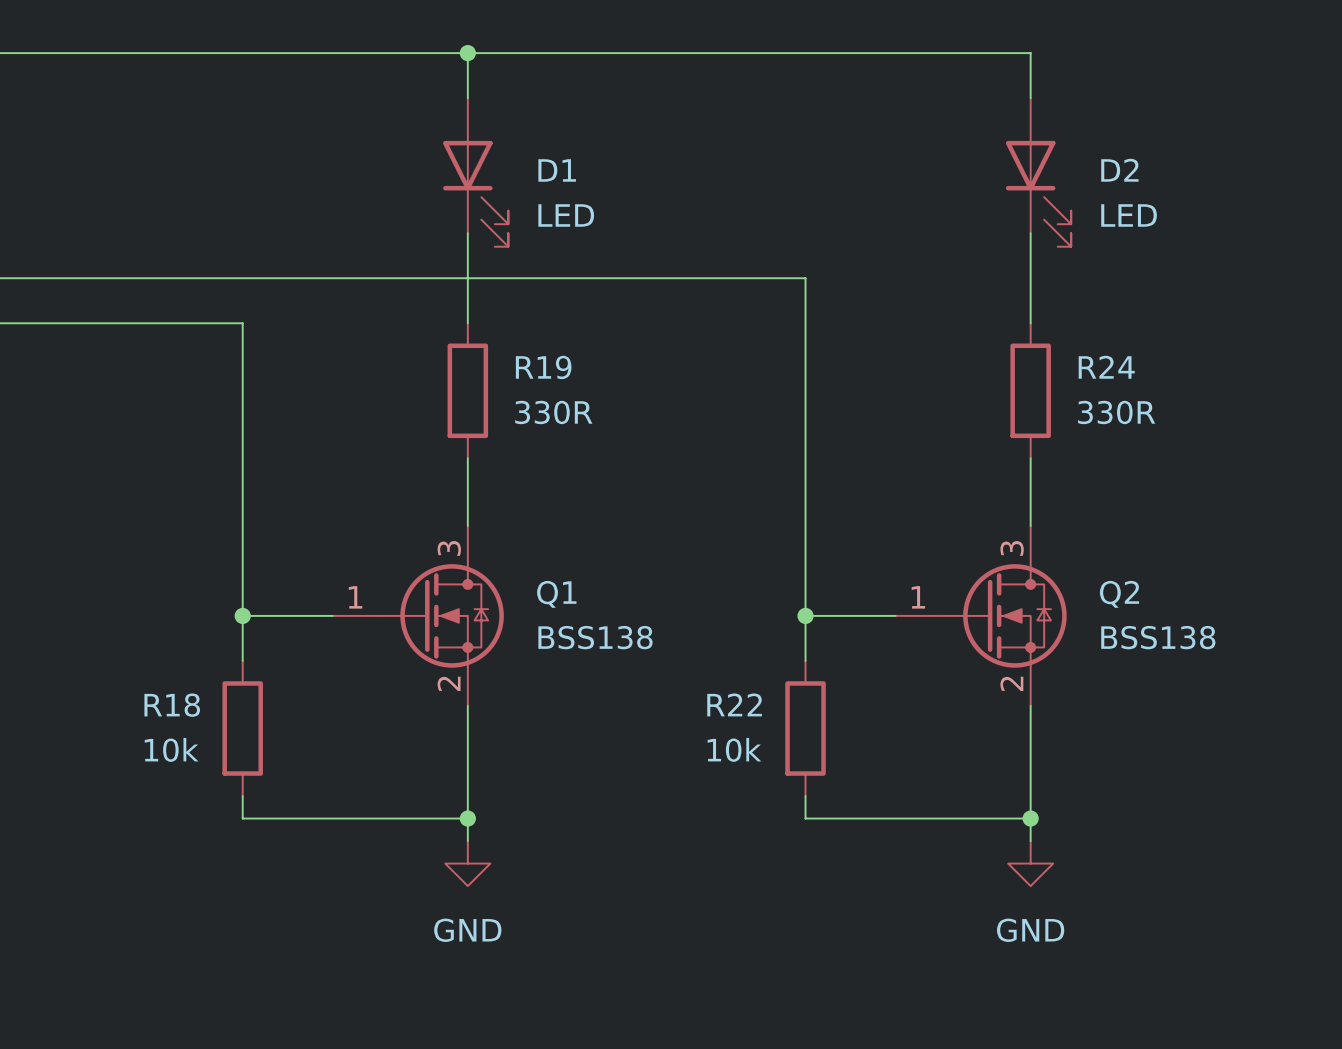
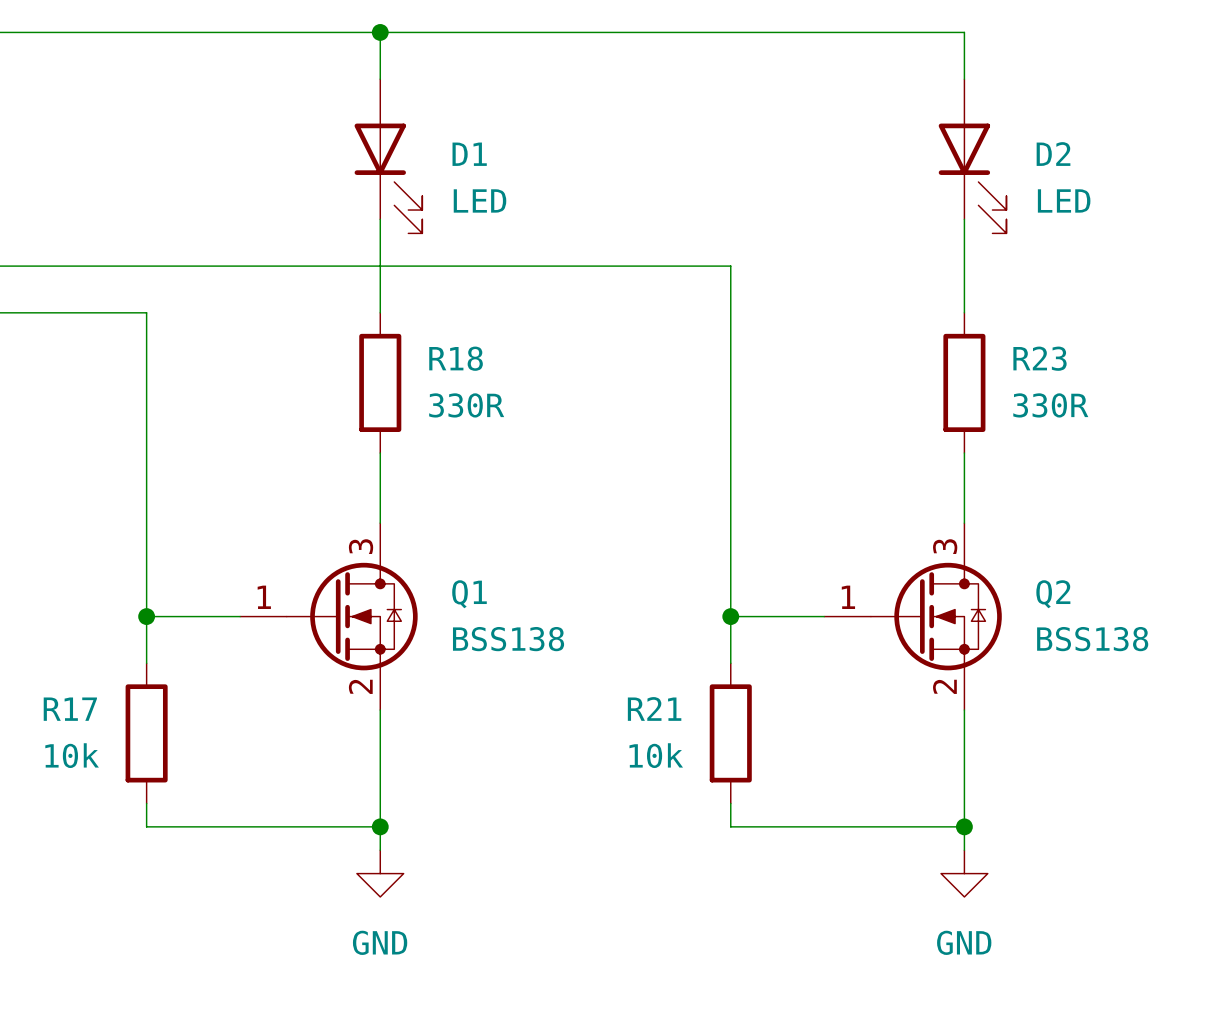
R19 name: R19 (543, 367) -> R18 (456, 358)
R24 name: R24 (1106, 367) -> R23 (1040, 358)
R22 name: R22 (734, 704) -> R21 (654, 708)
R18 name: R18 (172, 705) -> R17 (70, 709)

